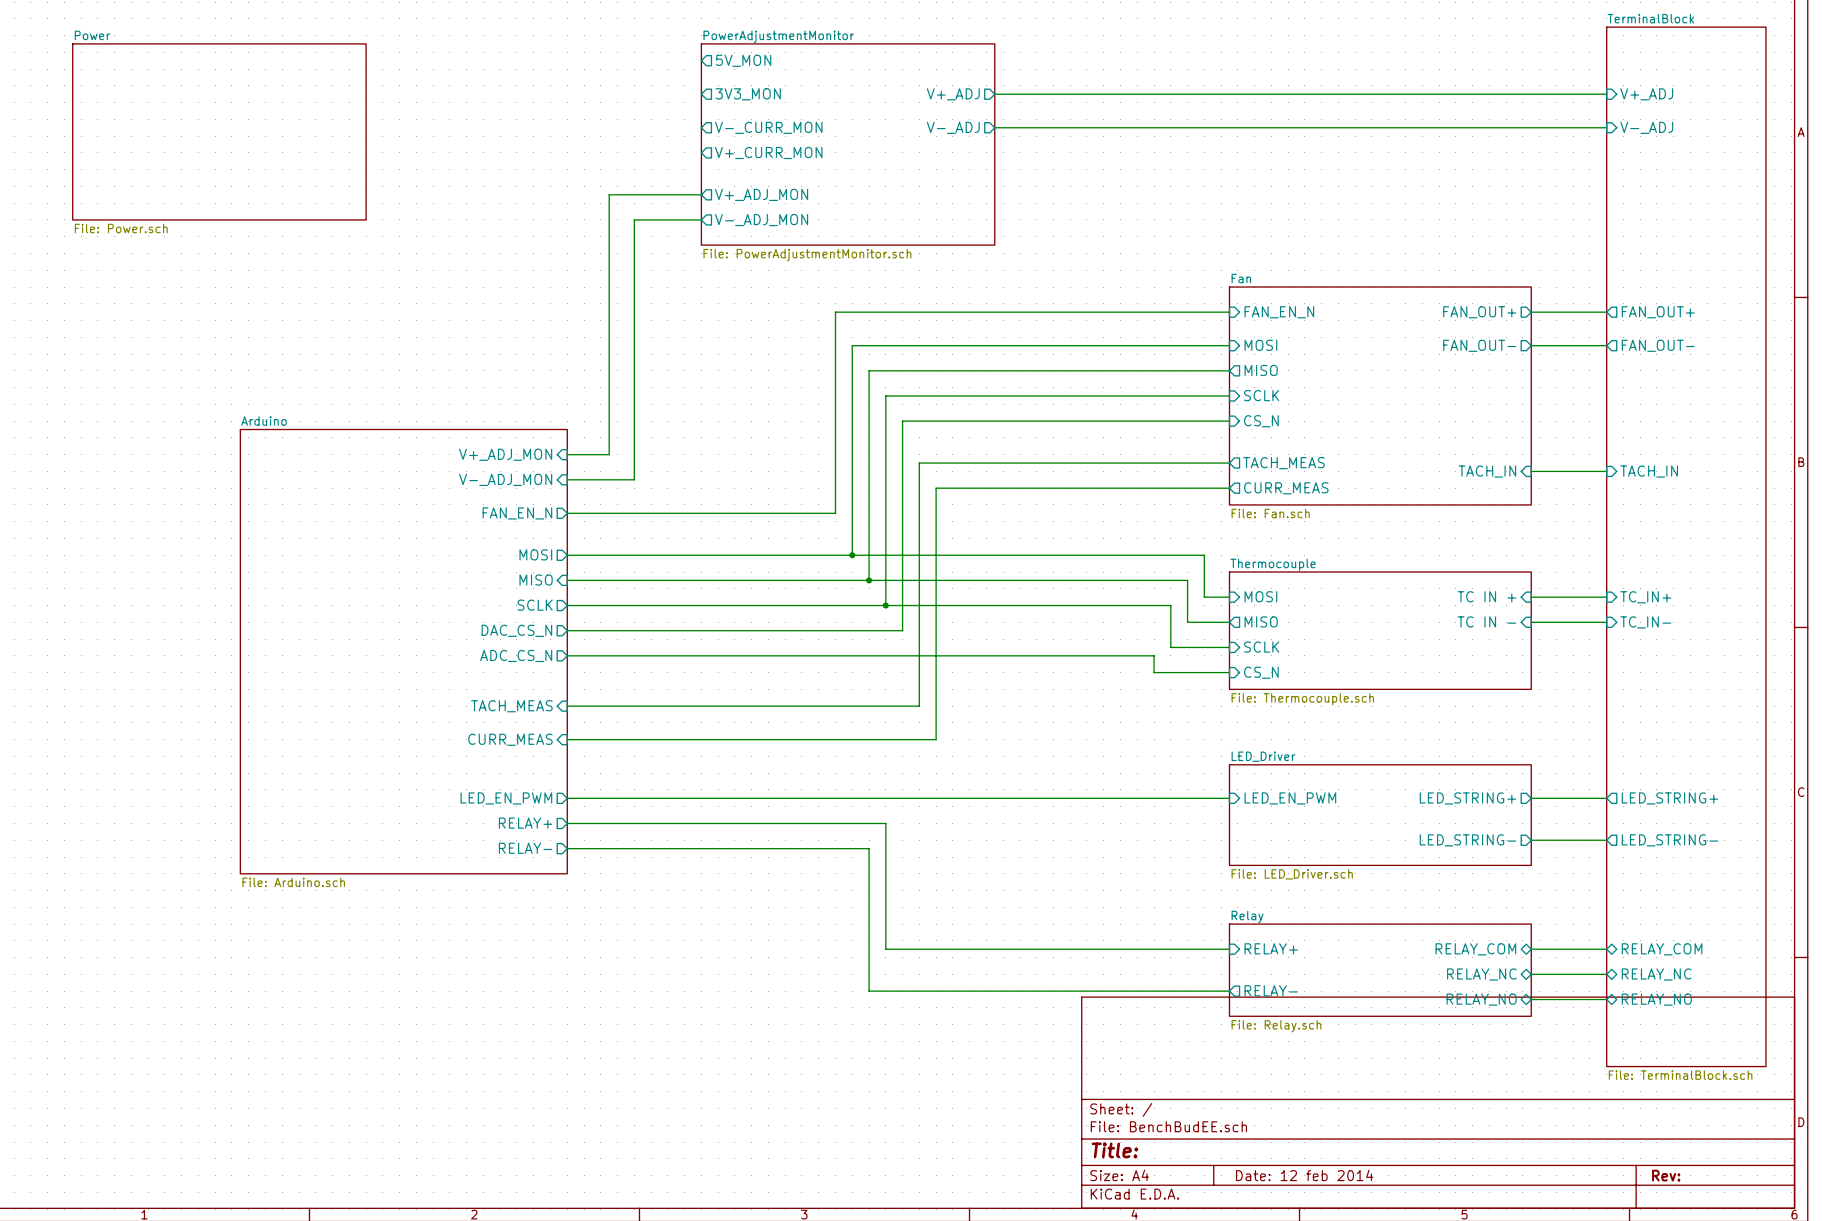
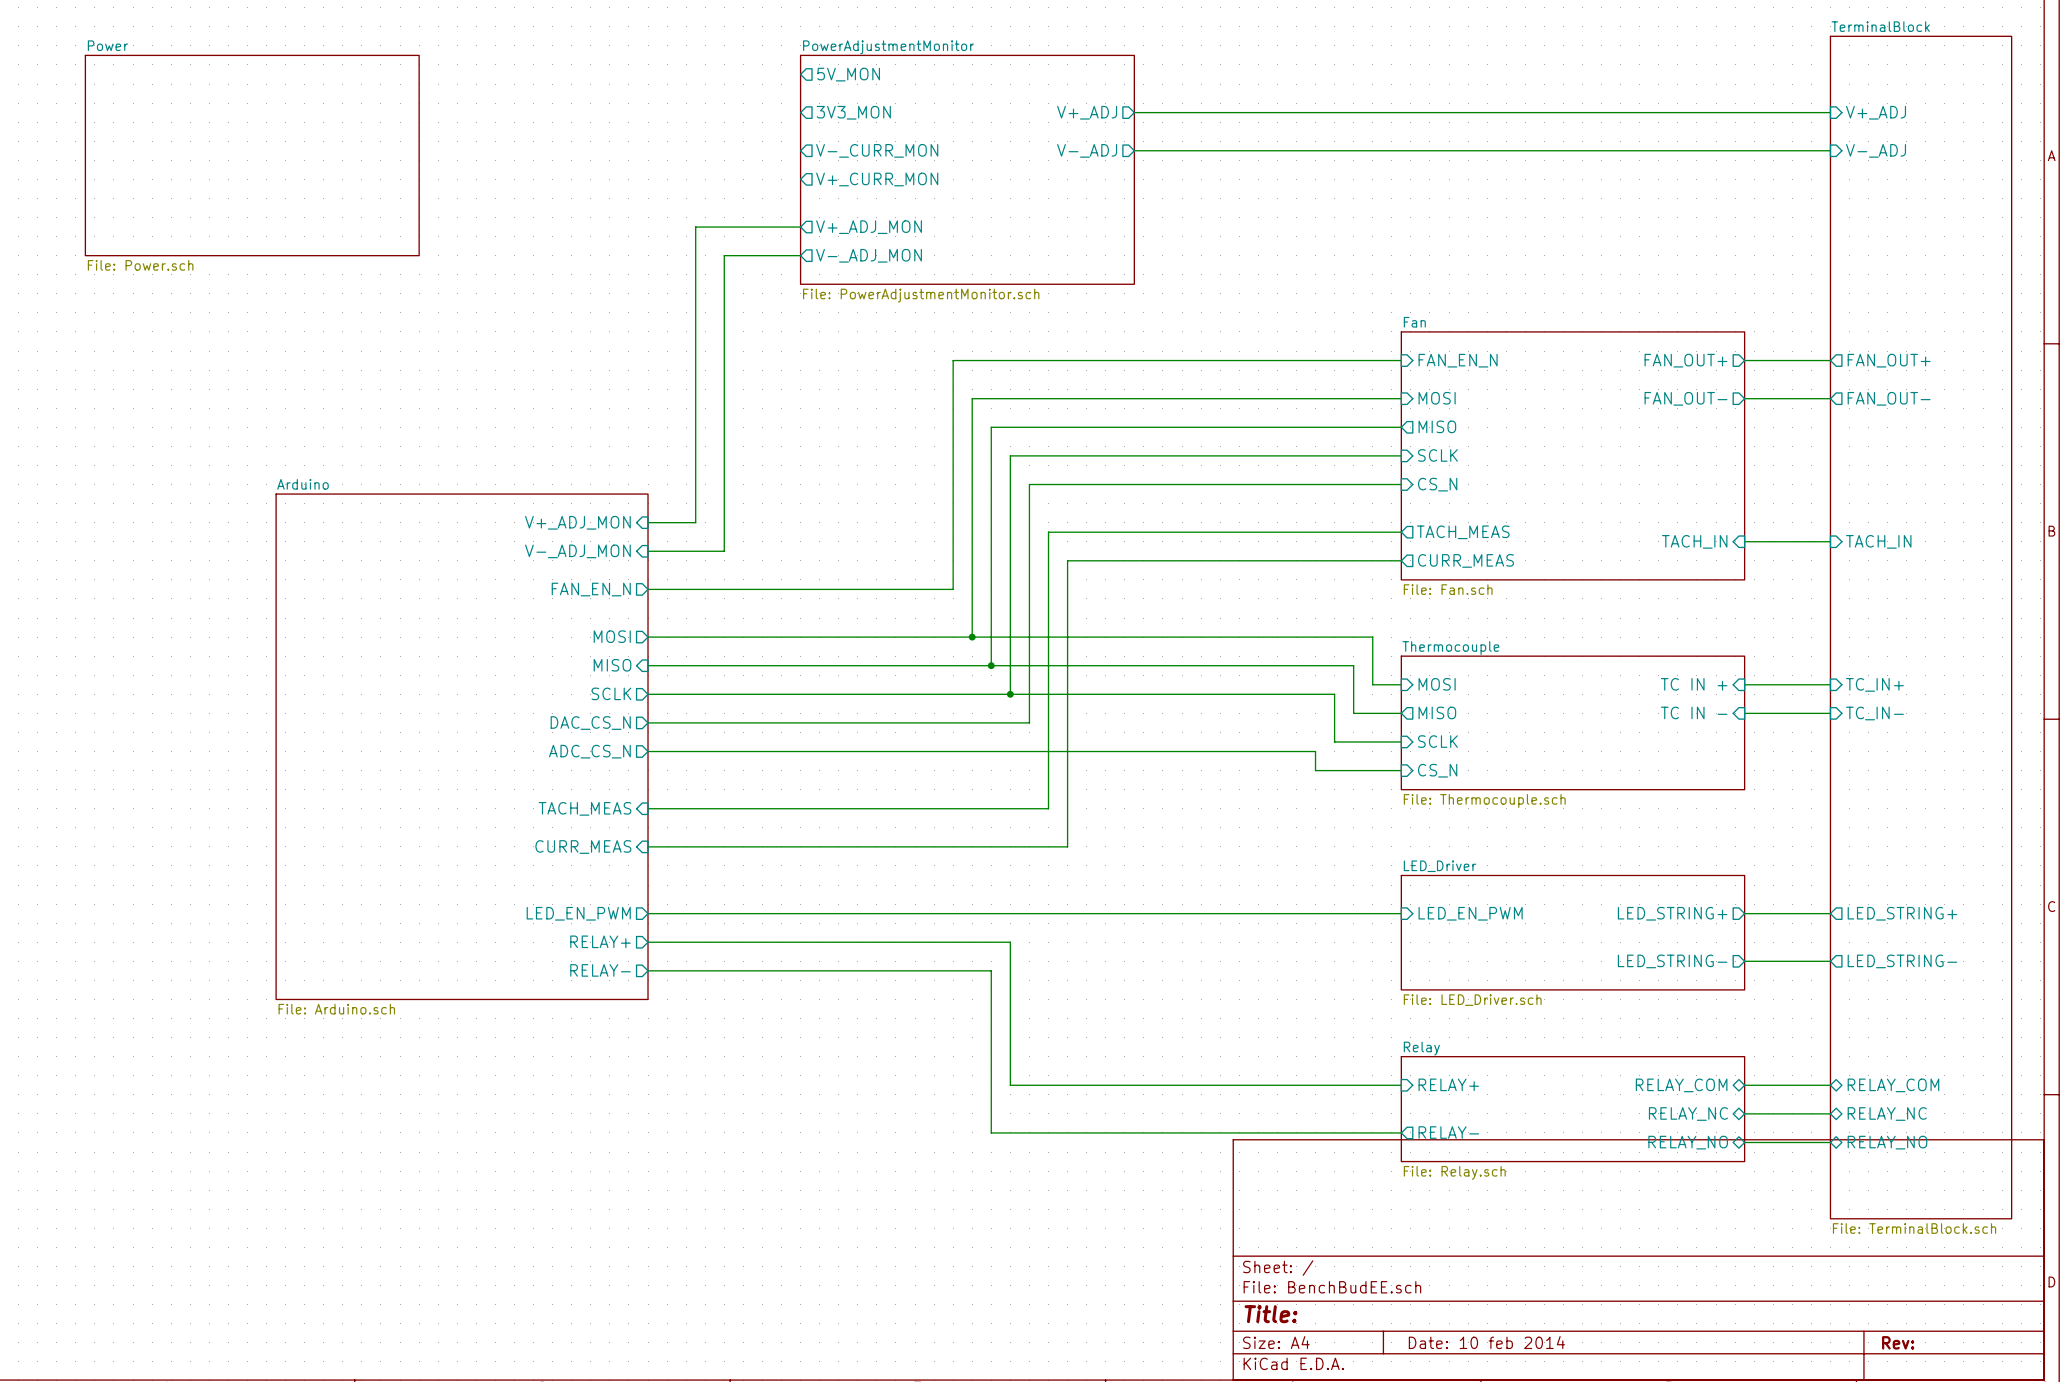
title block: Date: 12 feb 2014 (1304, 1175) -> Date: 10 feb 2014 (1486, 1342)

